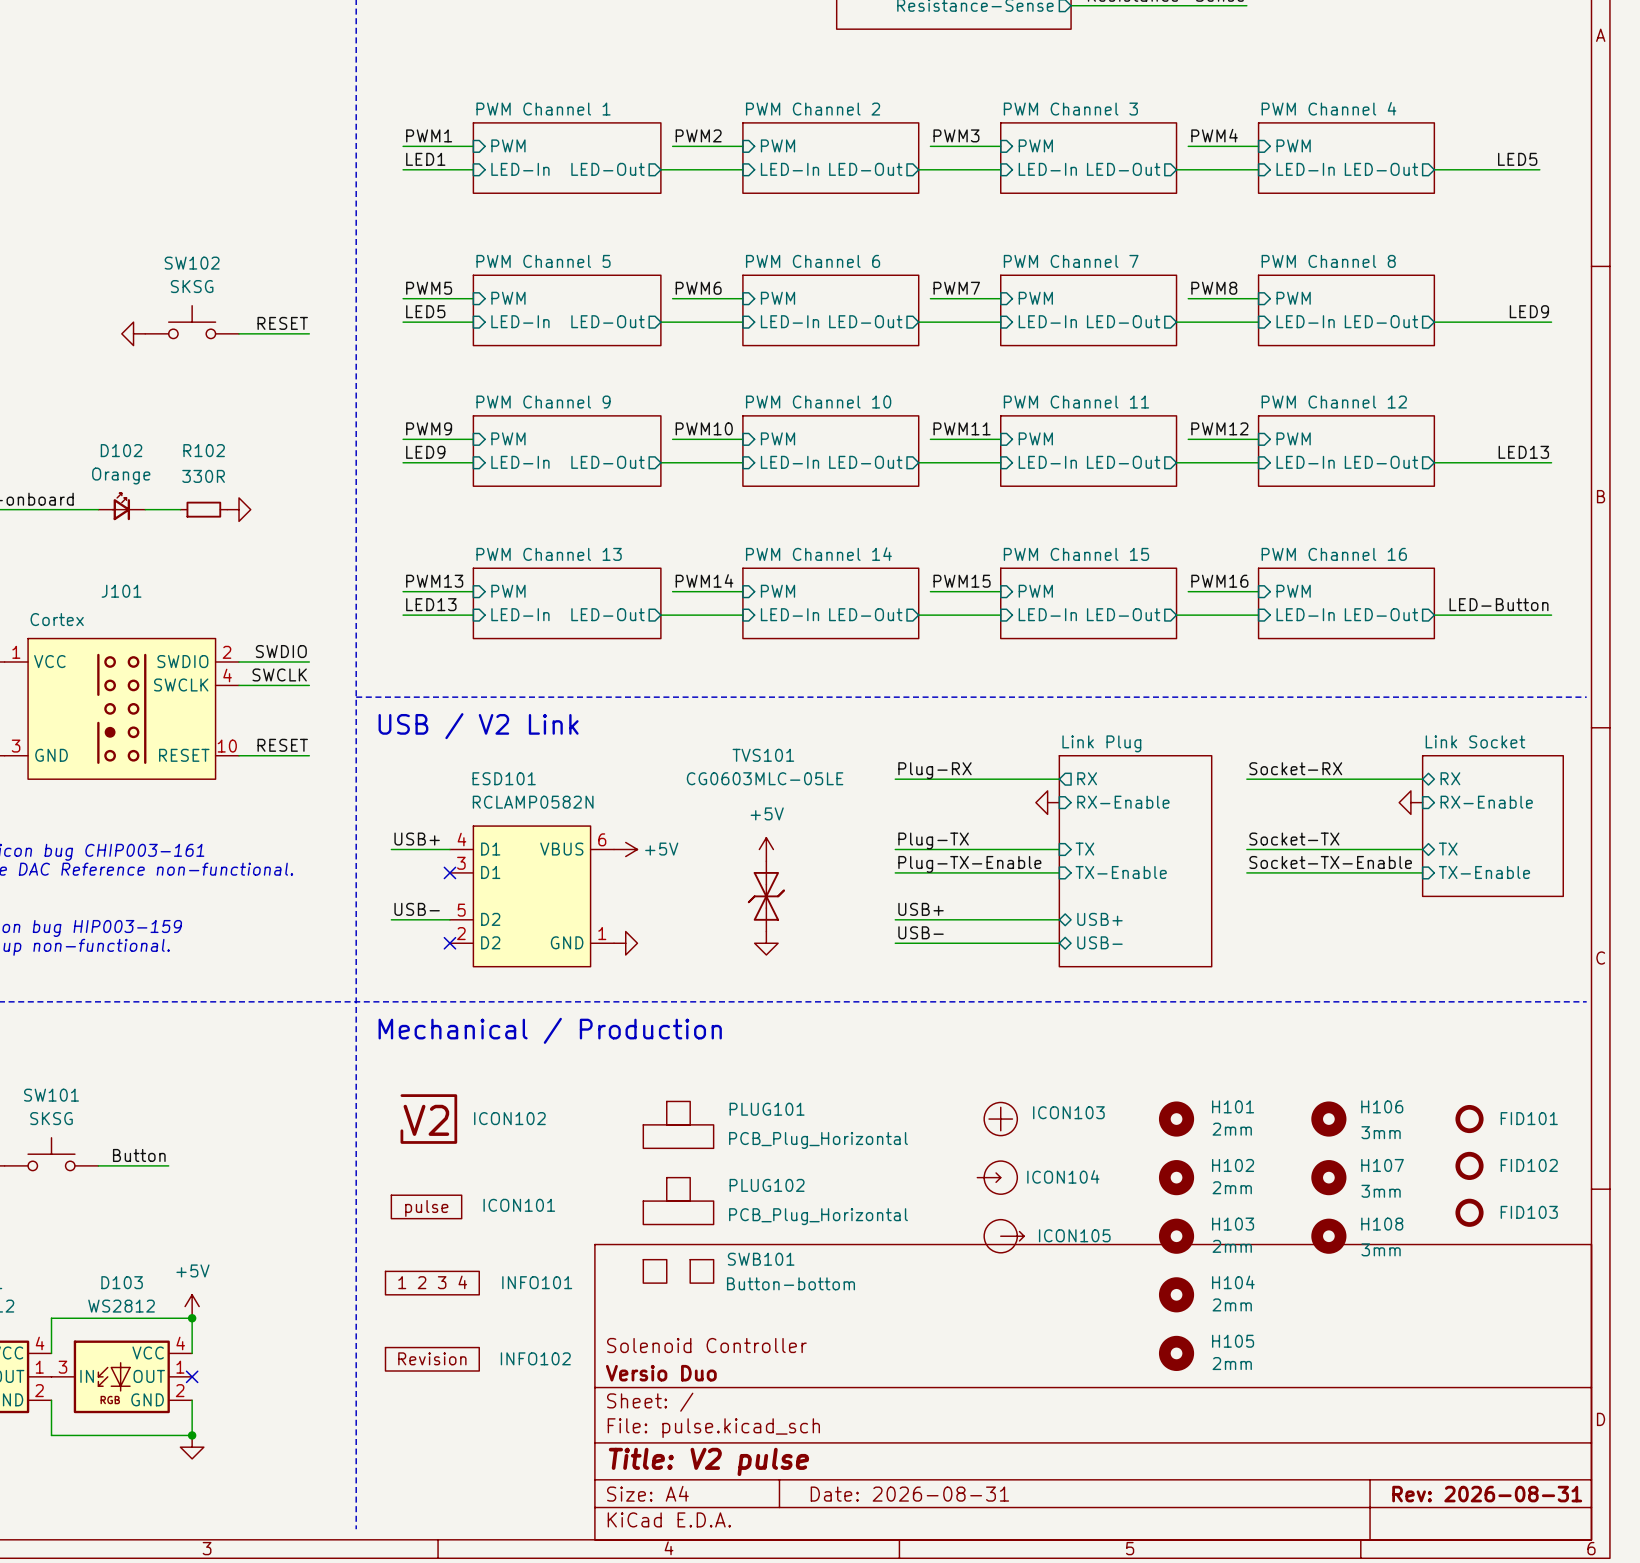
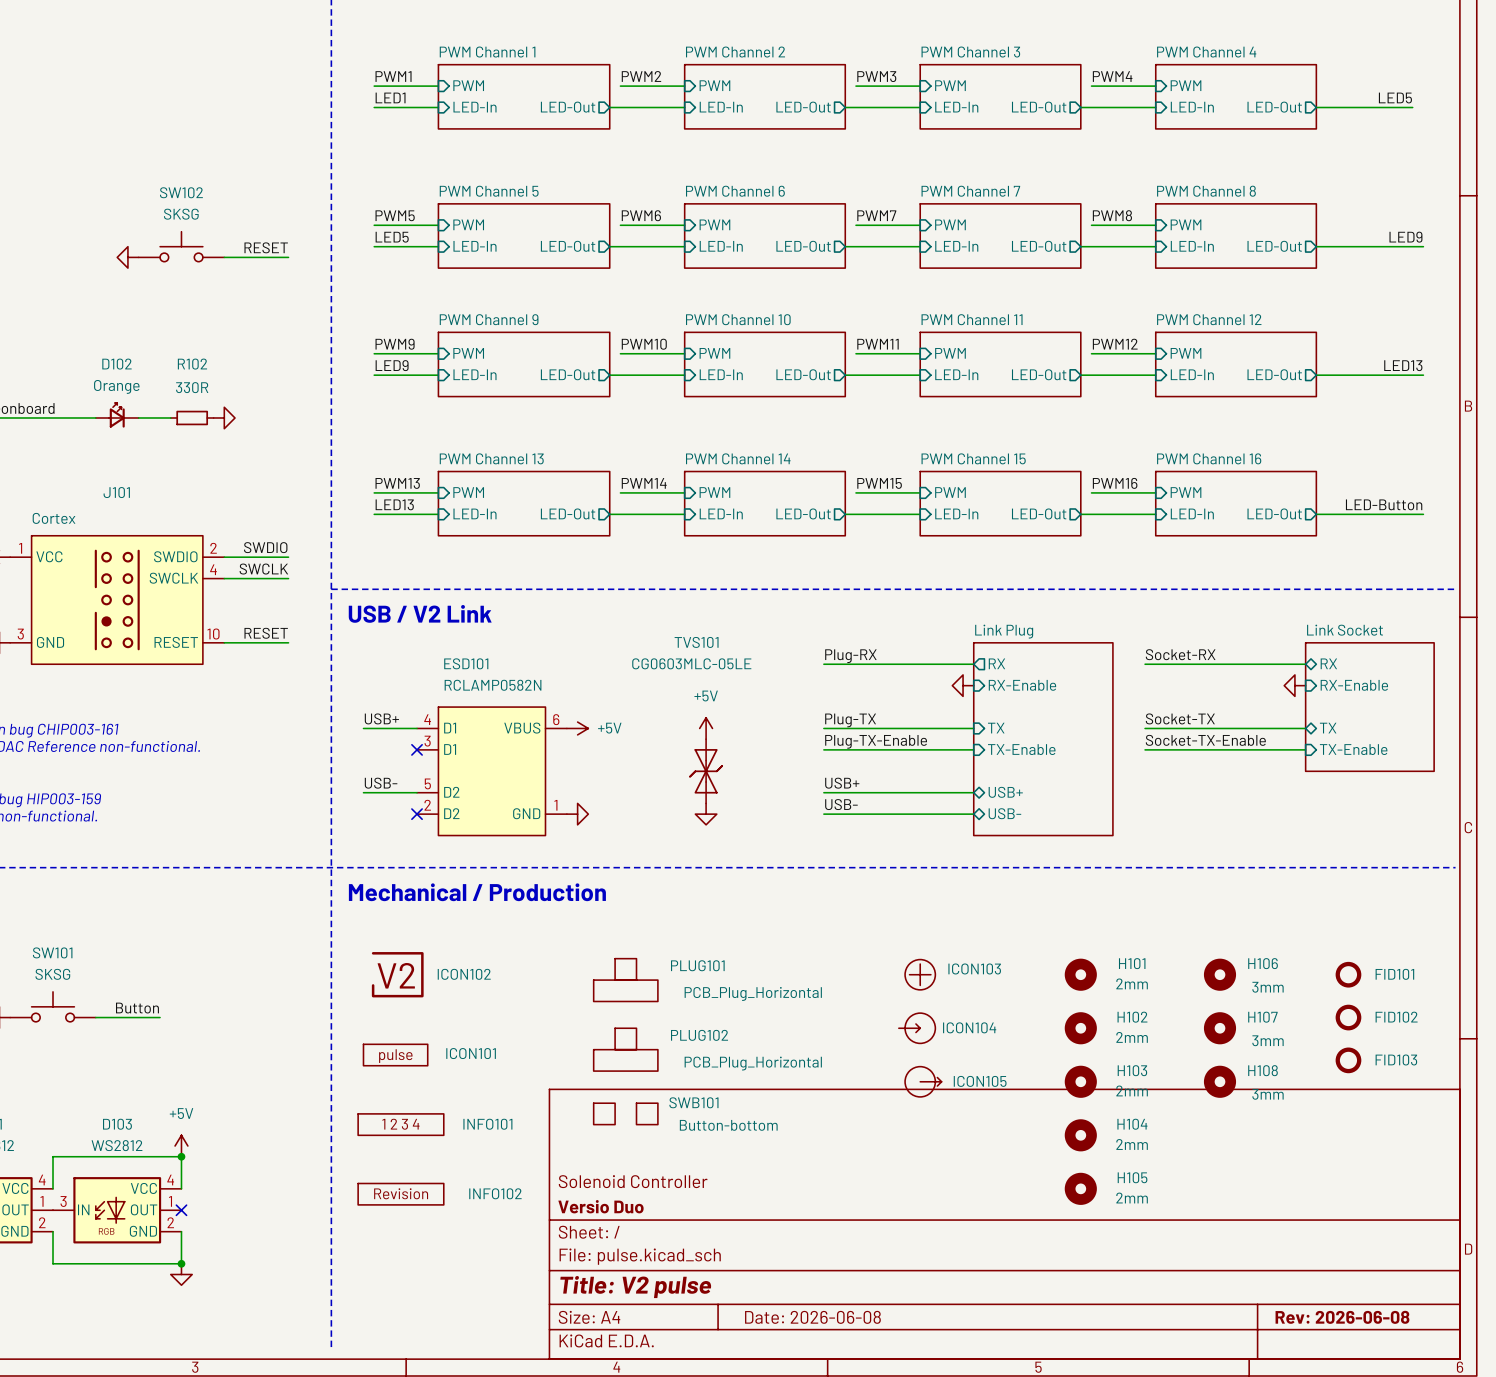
title block: Date: 2026-08-31 (909, 1494) -> Date: 2026-06-08 (812, 1317)
title block: Rev: 2026-08-31 (1487, 1494) -> Rev: 2026-06-08 (1342, 1317)

